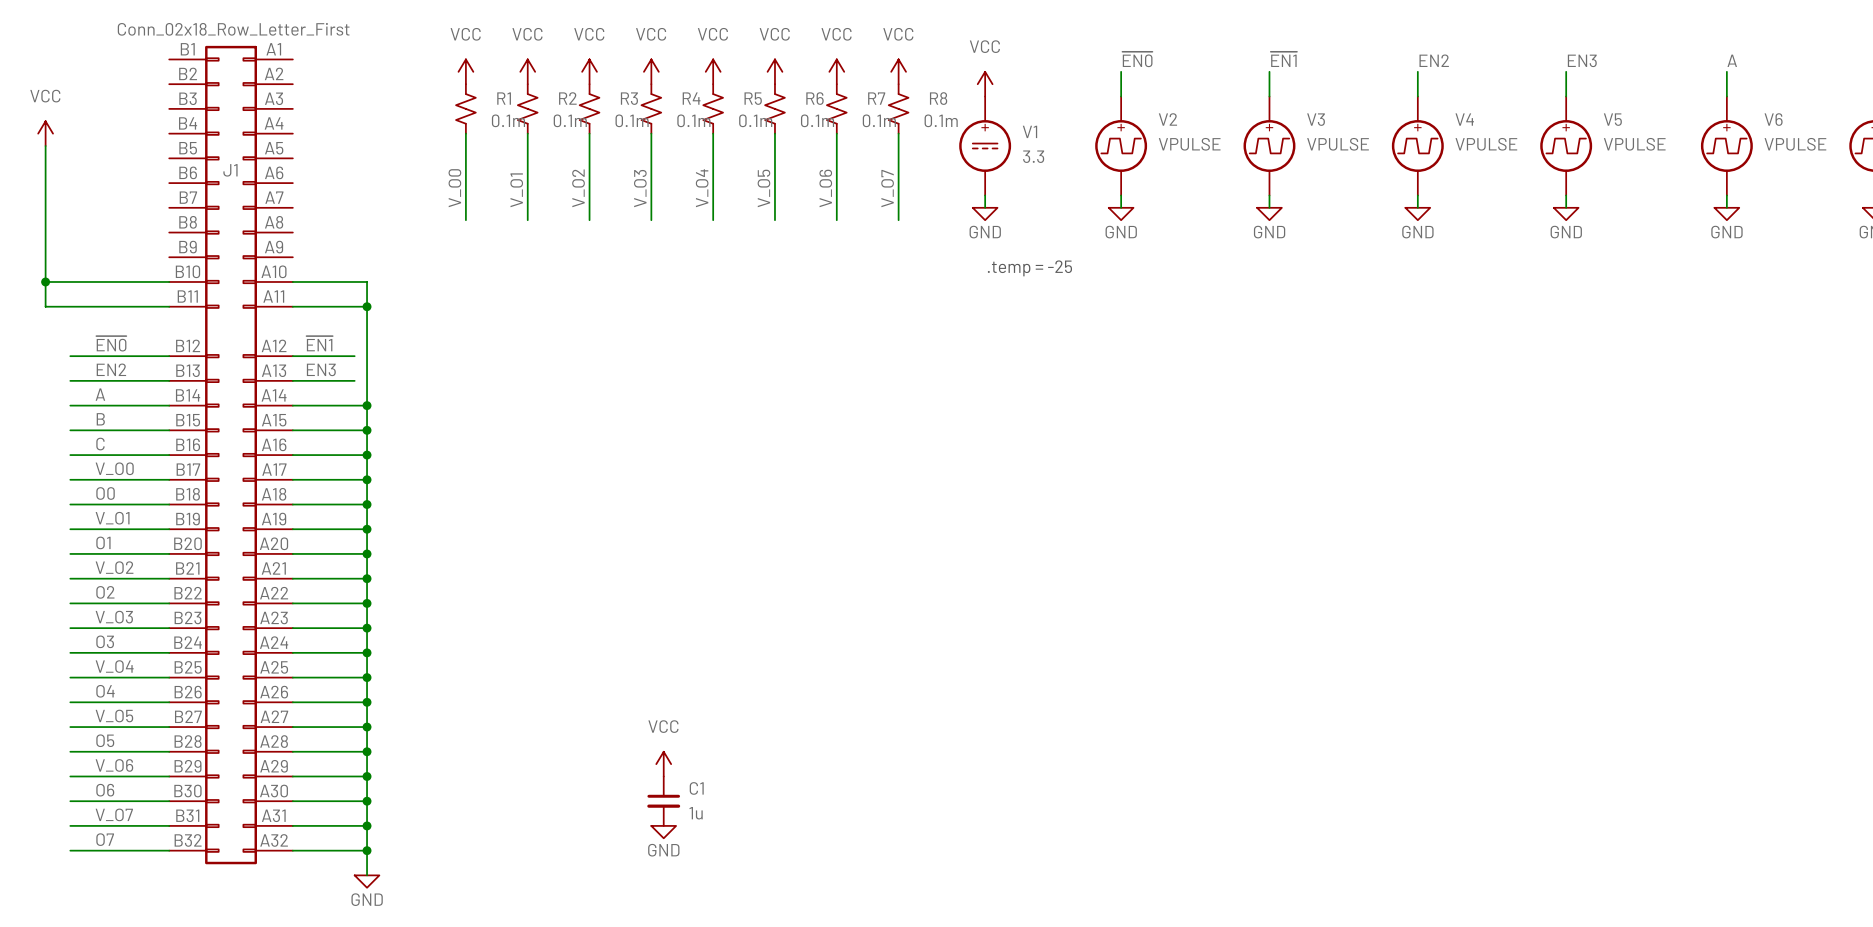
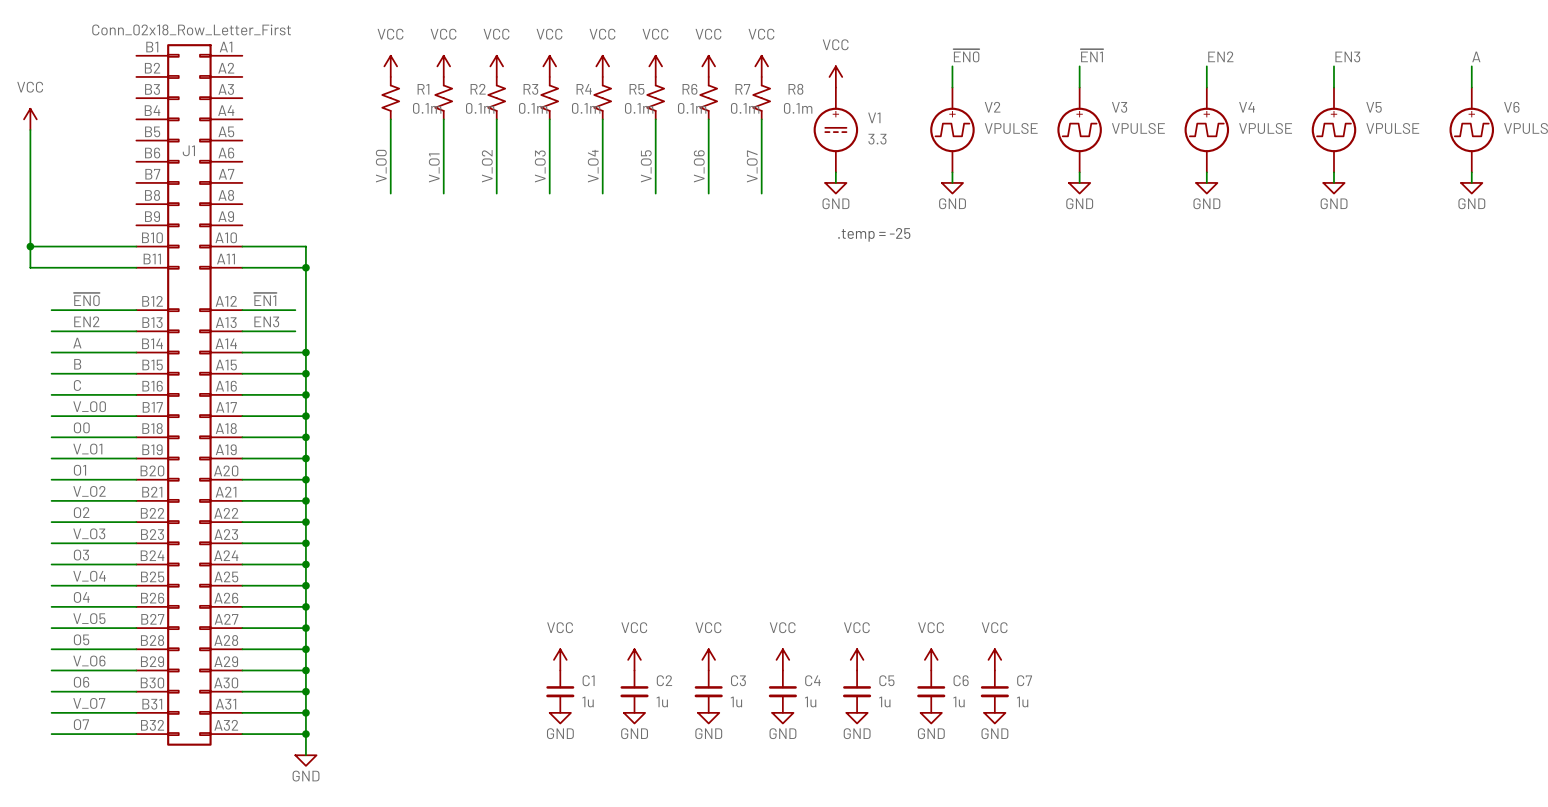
power symbol: none -> VCC (634, 659)
power symbol: none -> VCC (708, 659)
power symbol: none -> VCC (782, 659)
power symbol: none -> VCC (857, 659)
power symbol: none -> VCC (931, 659)
power symbol: none -> VCC (994, 659)
C2: none -> 1u (634, 691)
C3: none -> 1u (708, 691)
C4: none -> 1u (782, 691)
C5: none -> 1u (857, 691)
C6: none -> 1u (931, 691)
C7: none -> 1u (994, 691)
power symbol: none -> GND (634, 718)
power symbol: none -> GND (708, 718)
power symbol: none -> GND (782, 718)
power symbol: none -> GND (857, 718)
power symbol: none -> GND (931, 718)
power symbol: none -> GND (994, 718)

